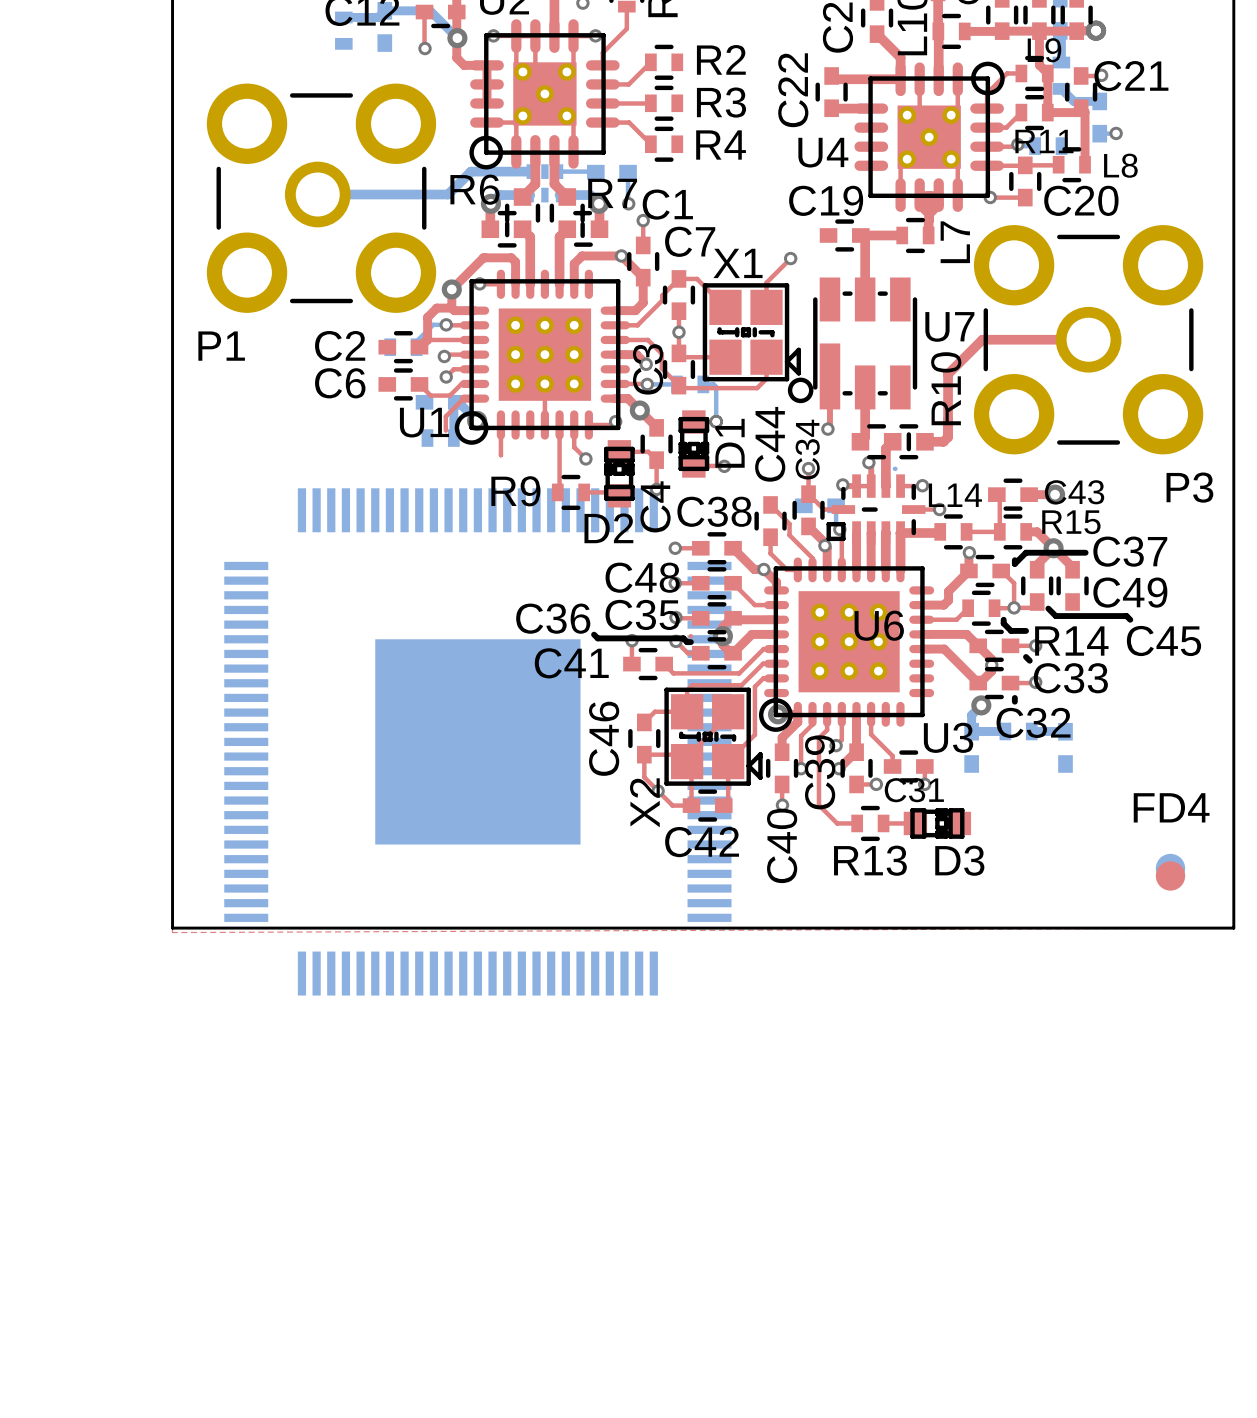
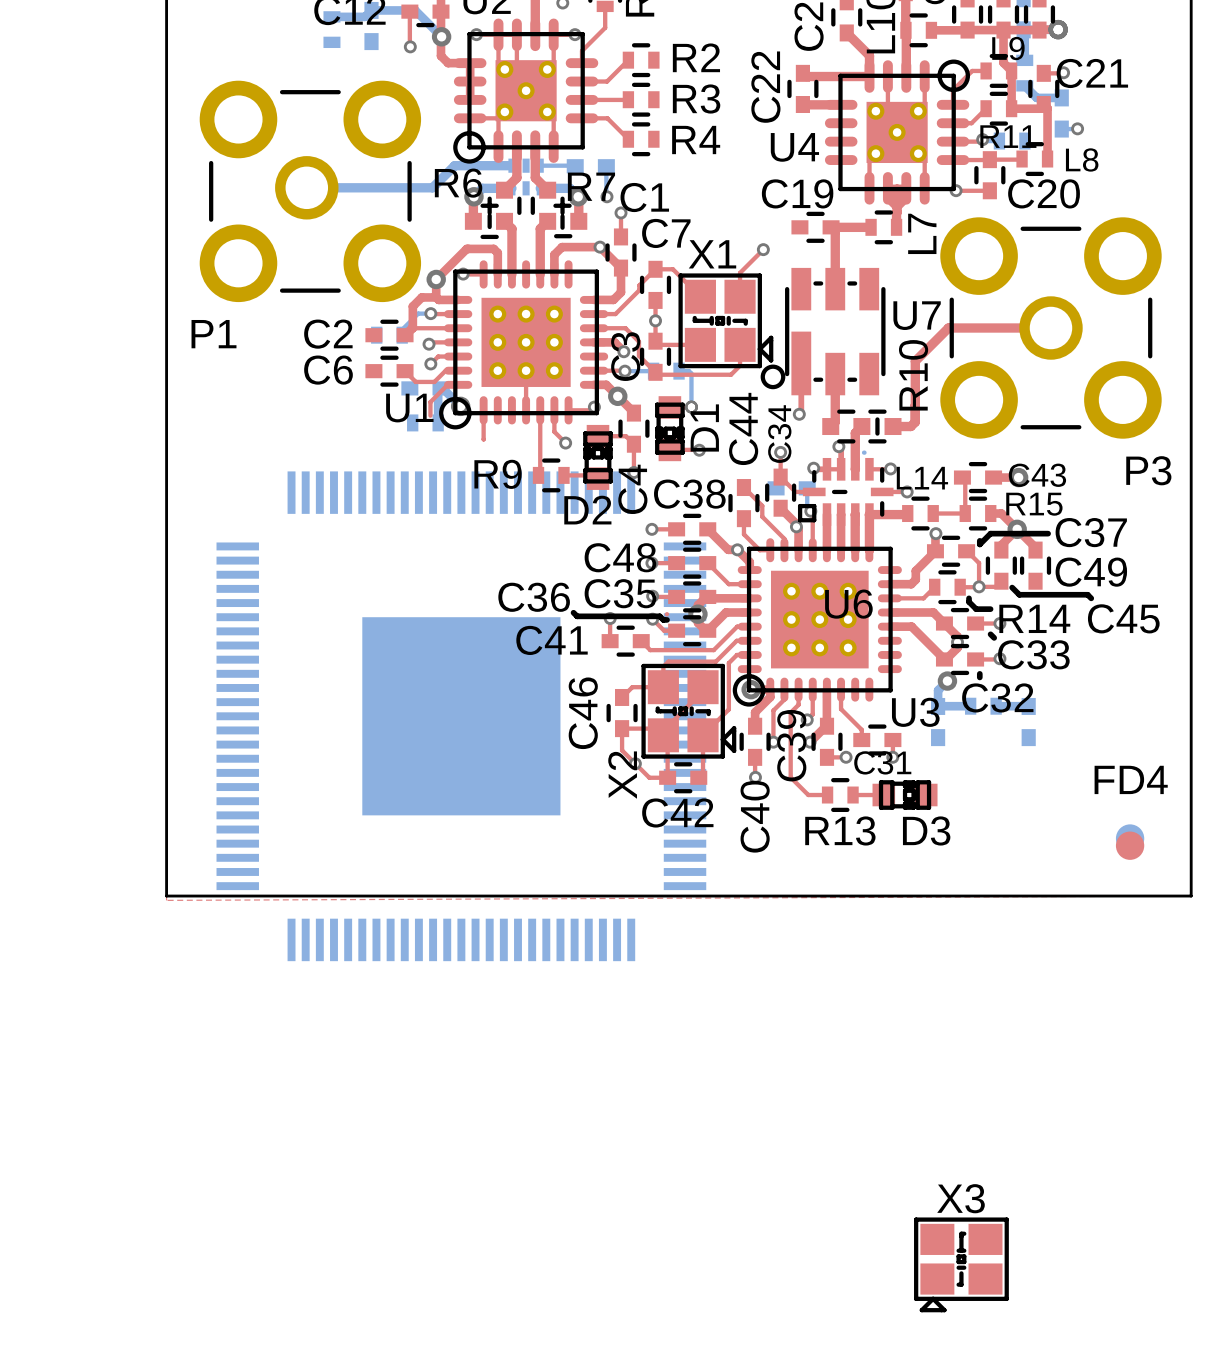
X3: none -> (961, 1264)

